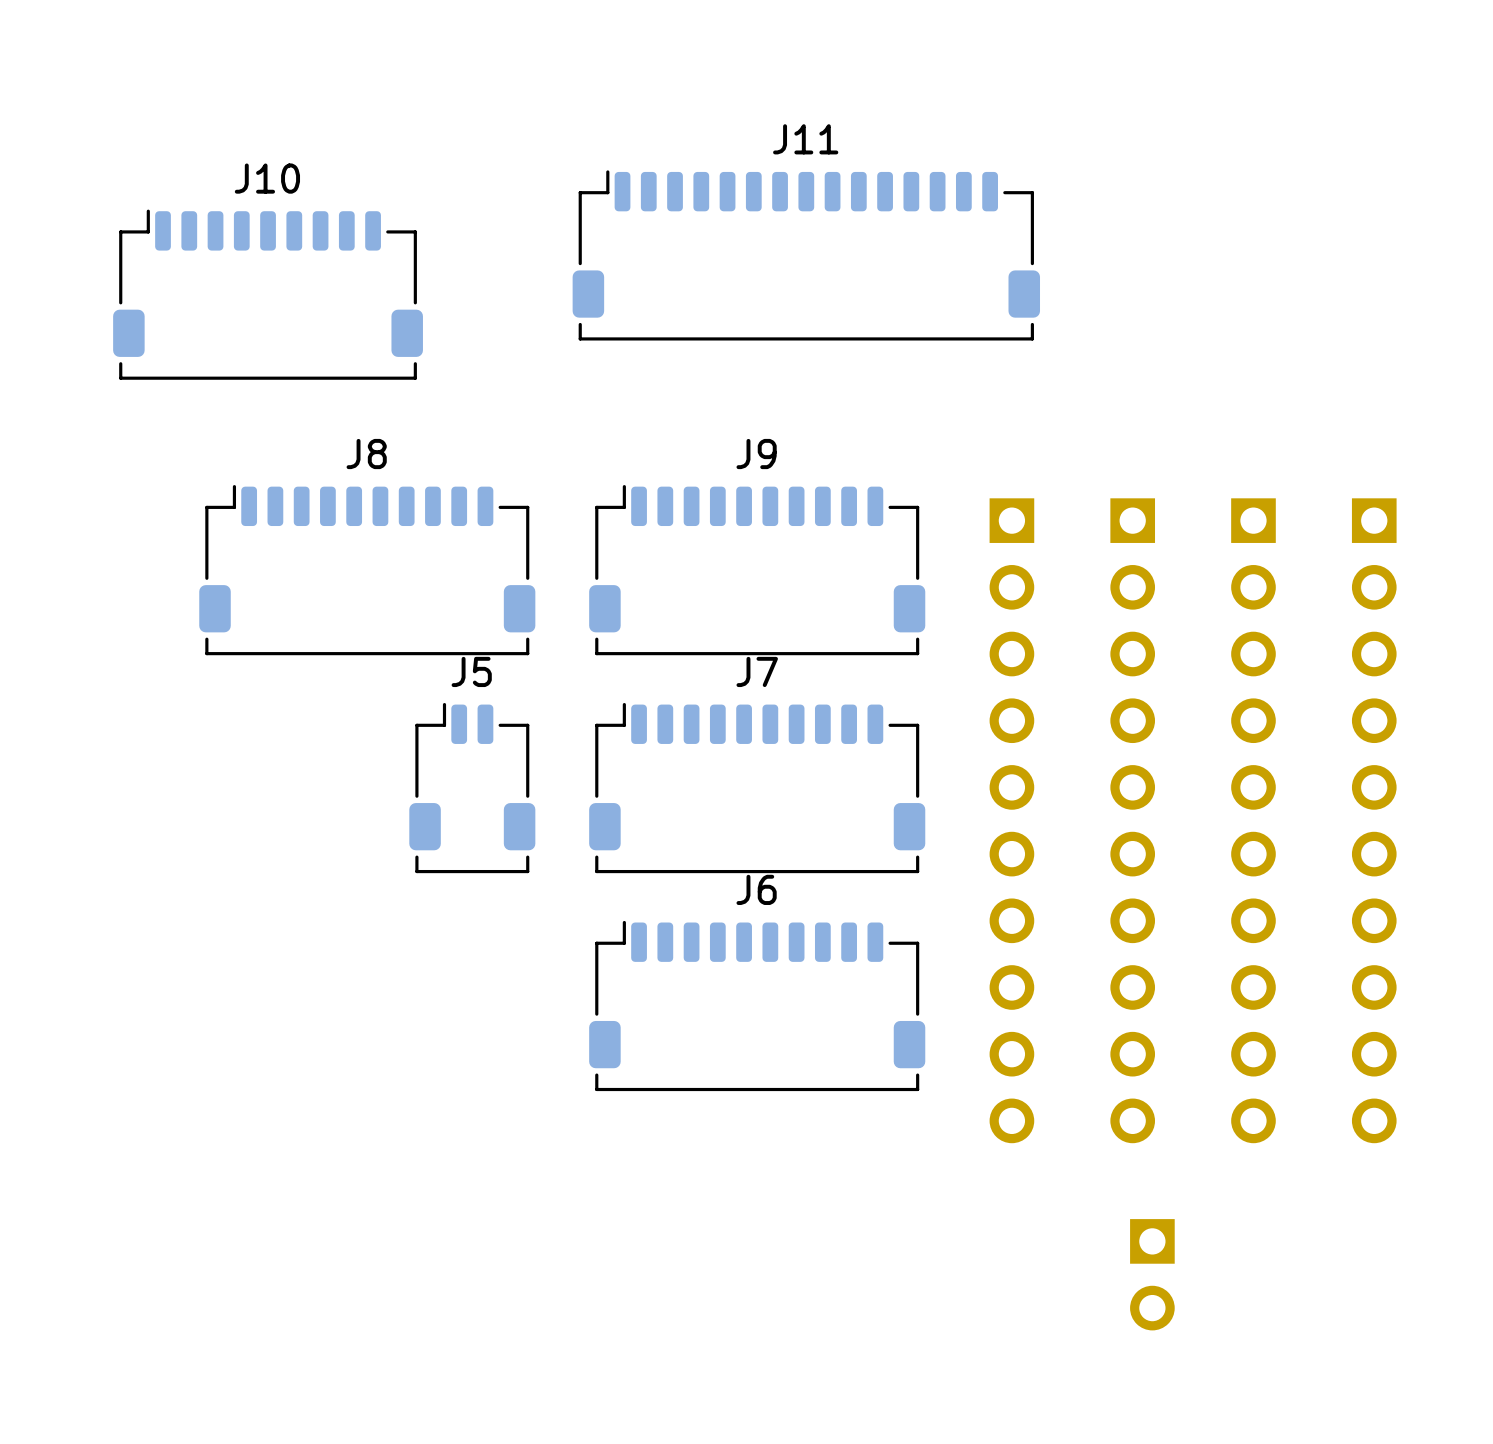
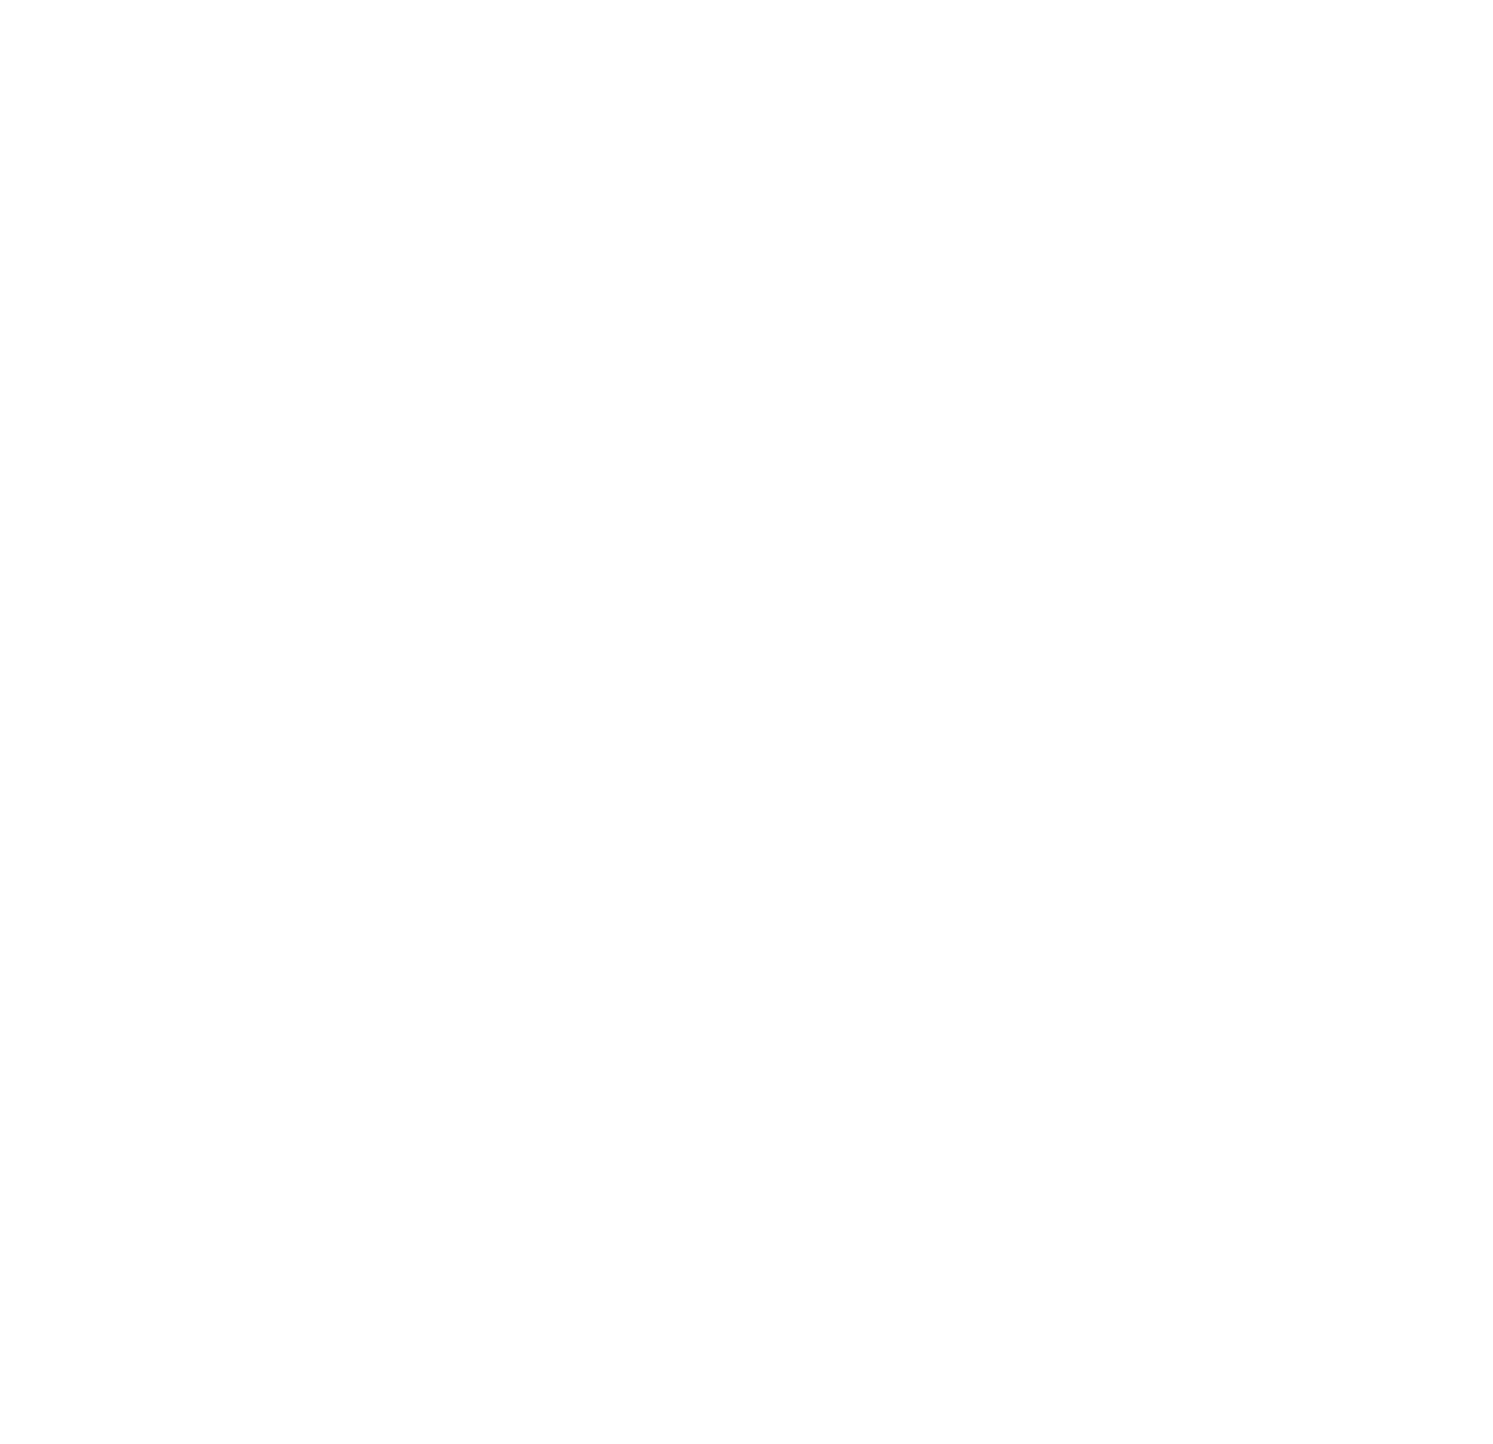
J11: (806, 255) -> none
J10: (268, 294) -> none
J8: (367, 570) -> none
J9: (757, 570) -> none
J5: (472, 788) -> none
J7: (757, 788) -> none
part: (1011, 820) -> none
part: (1132, 820) -> none
part: (1253, 820) -> none
part: (1374, 820) -> none
J6: (757, 1006) -> none
part: (1152, 1274) -> none

